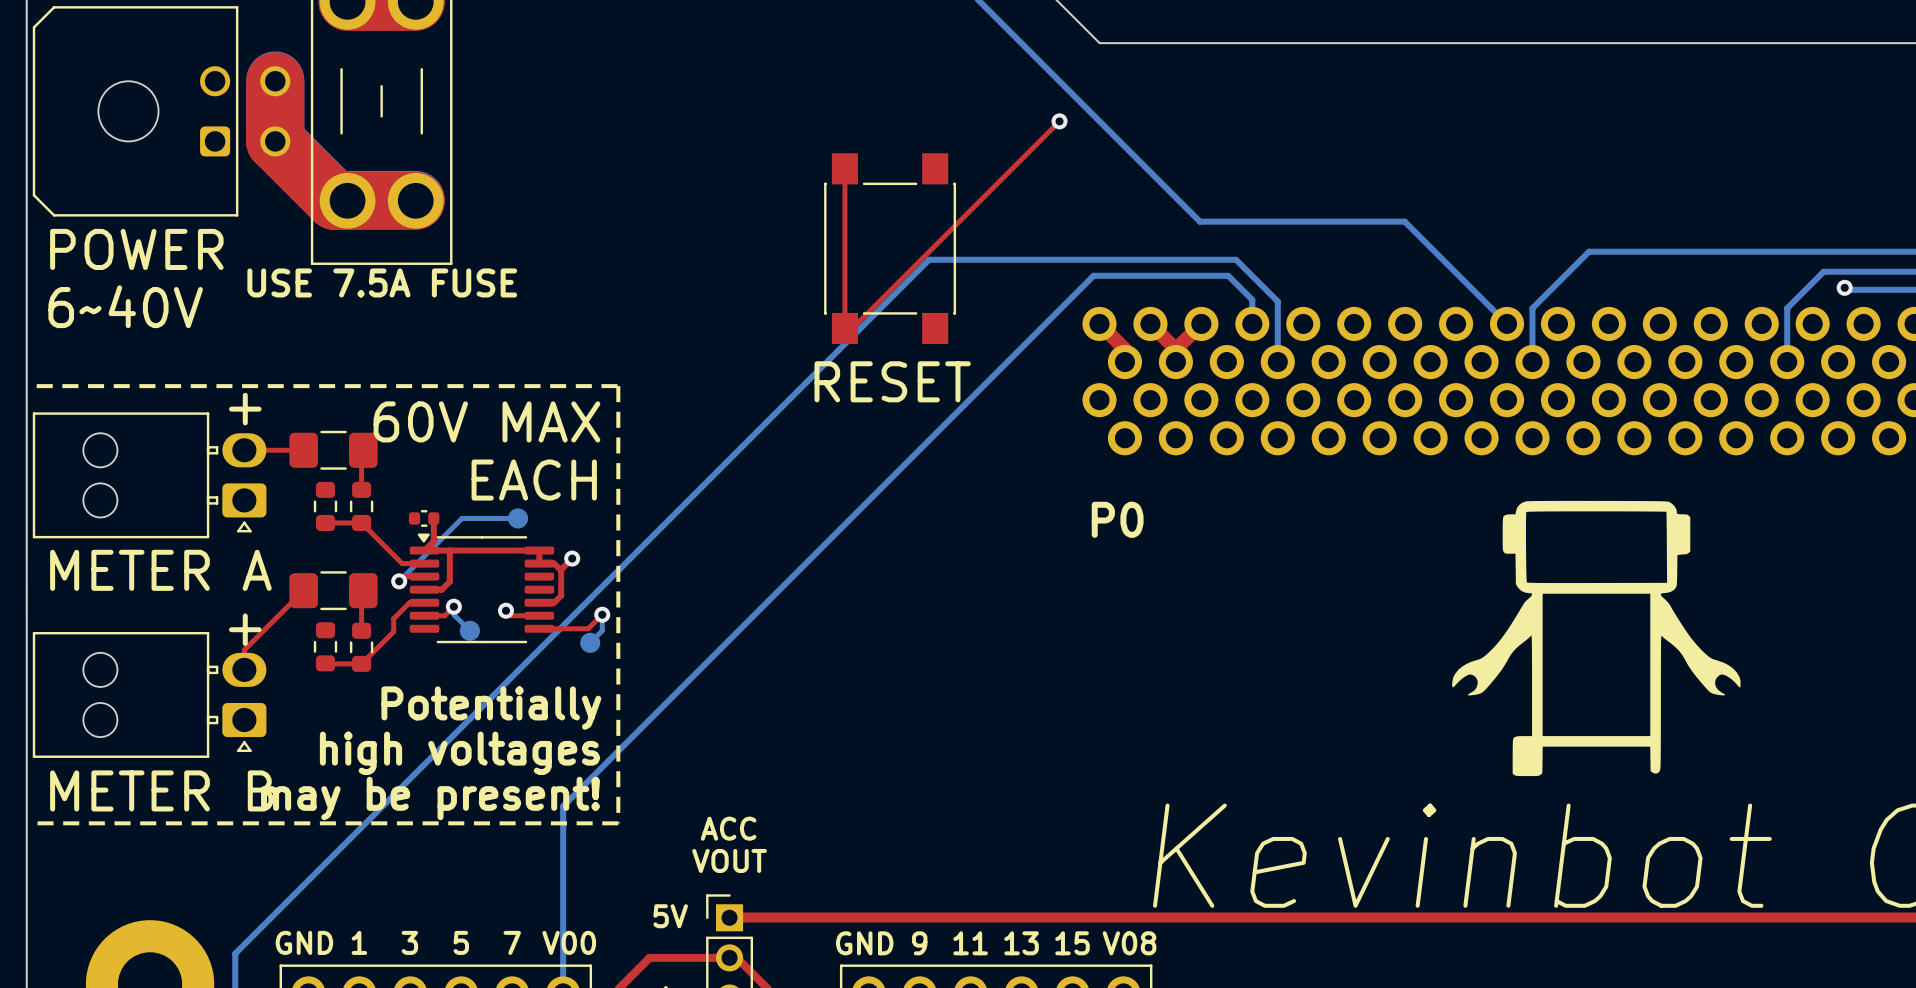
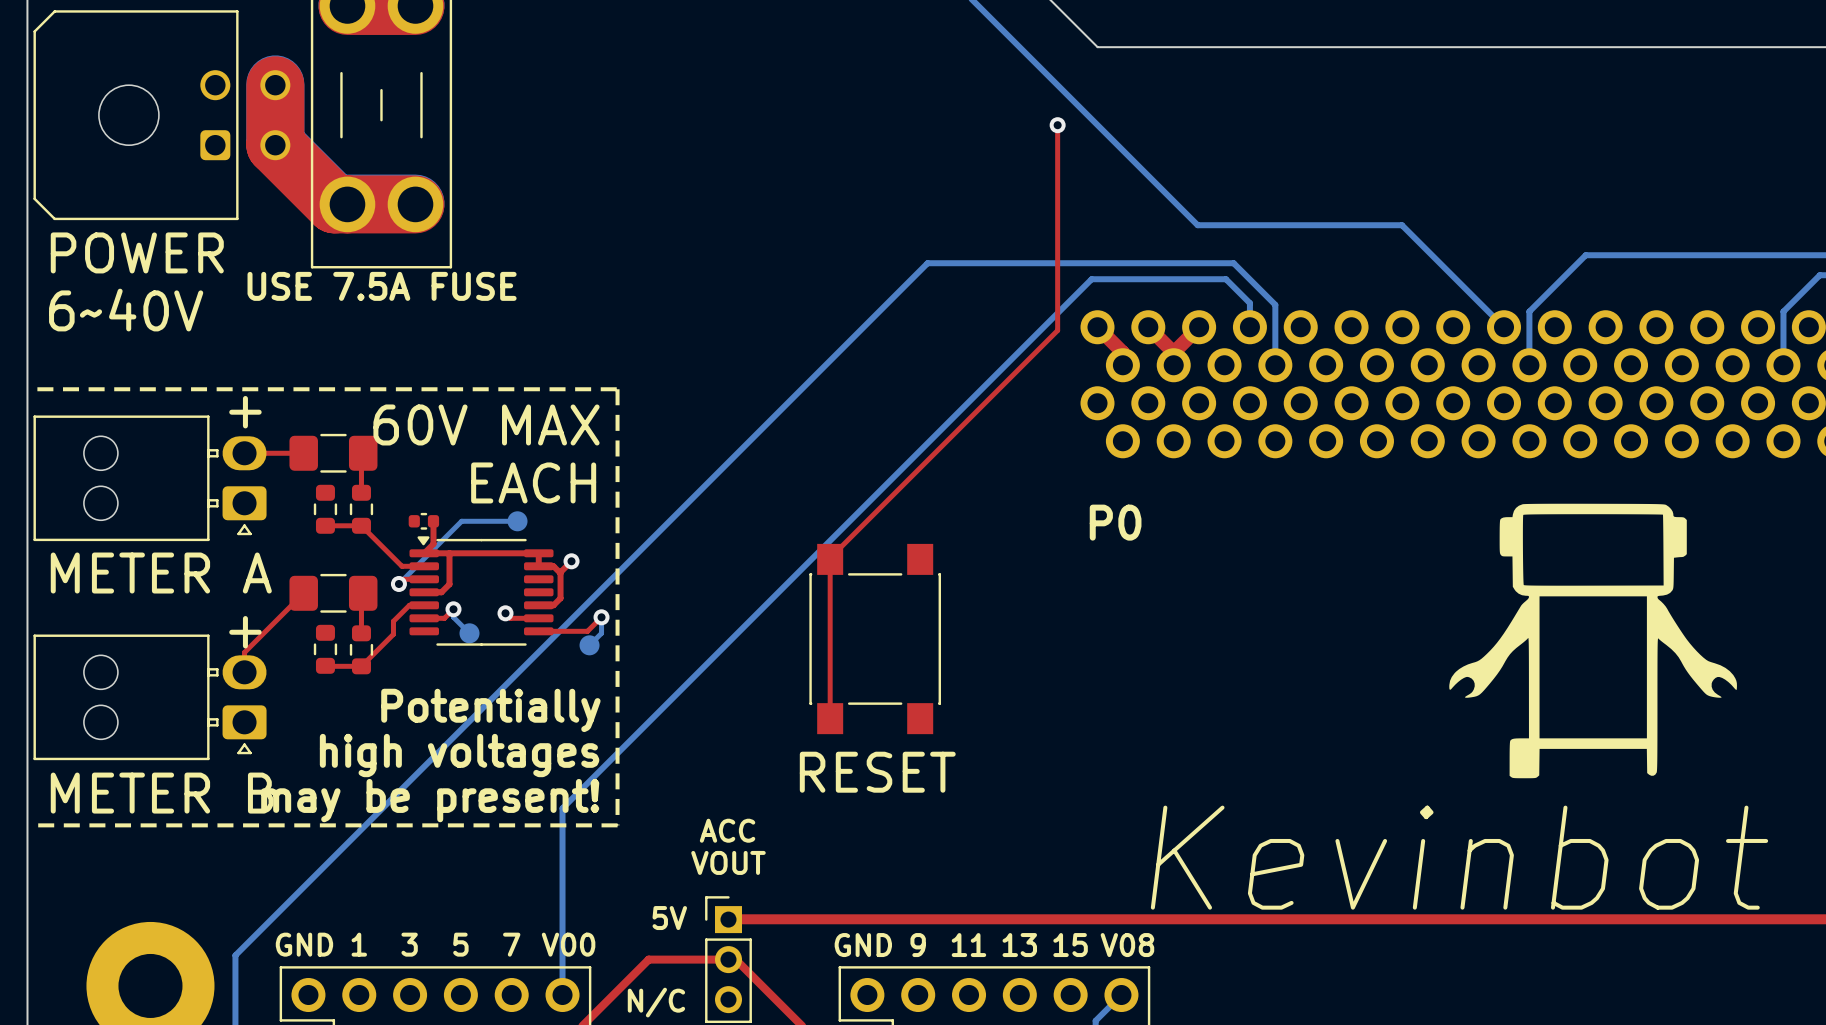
top track: (1059, 121) (852, 328) (844, 328) (844, 168) -> (1057, 125) (1057, 330) (830, 557) (830, 718)
part position: (890, 248) -> (875, 639)
text position: RESET (892, 381) -> RESET (877, 772)

